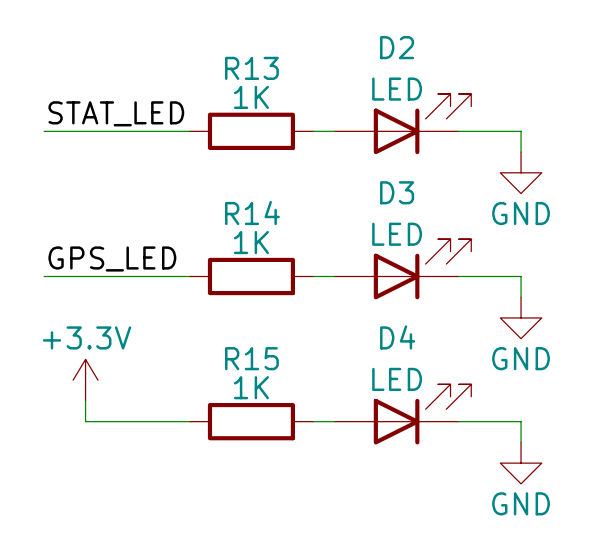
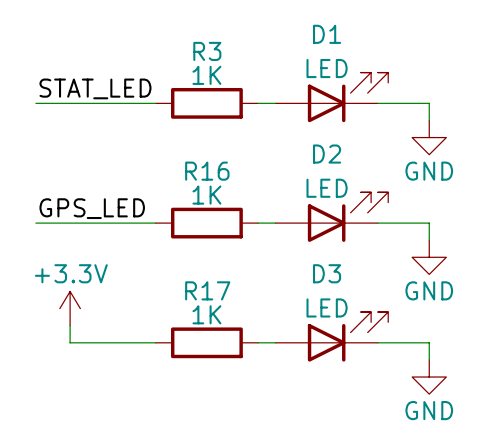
D2 name: D2 (397, 47) -> D1 (327, 34)
R13 name: R13 (251, 68) -> R3 (207, 51)
D3 name: D3 (397, 192) -> D2 (327, 154)
R14 name: R14 (252, 213) -> R16 (207, 171)
D4 name: D4 (397, 337) -> D3 (327, 273)
R15 name: R15 (251, 358) -> R17 (207, 290)

